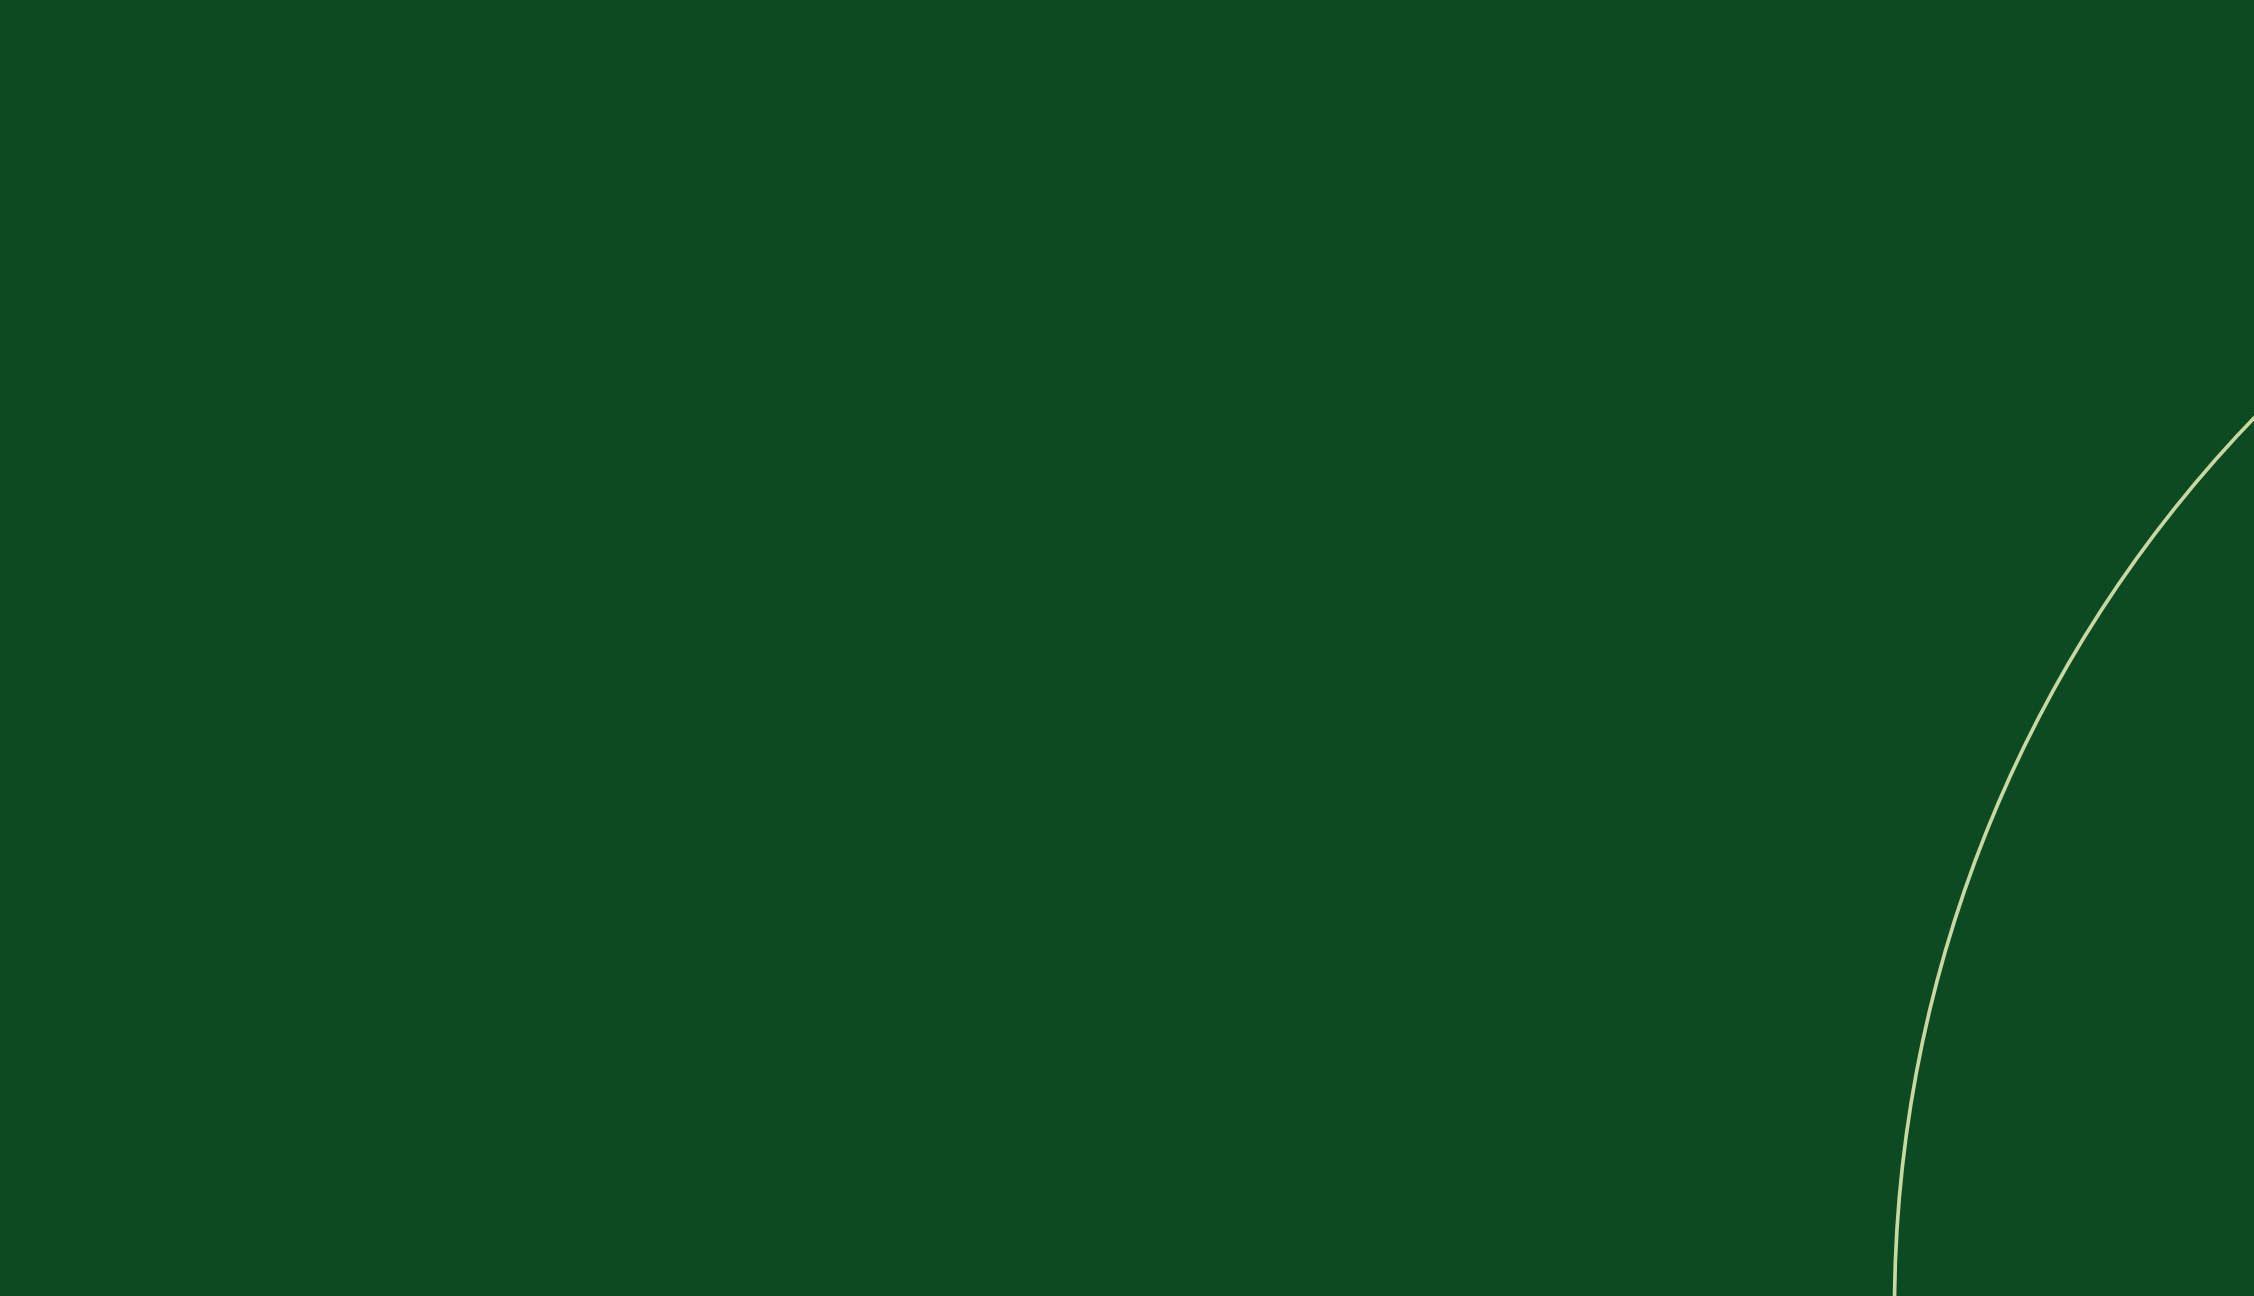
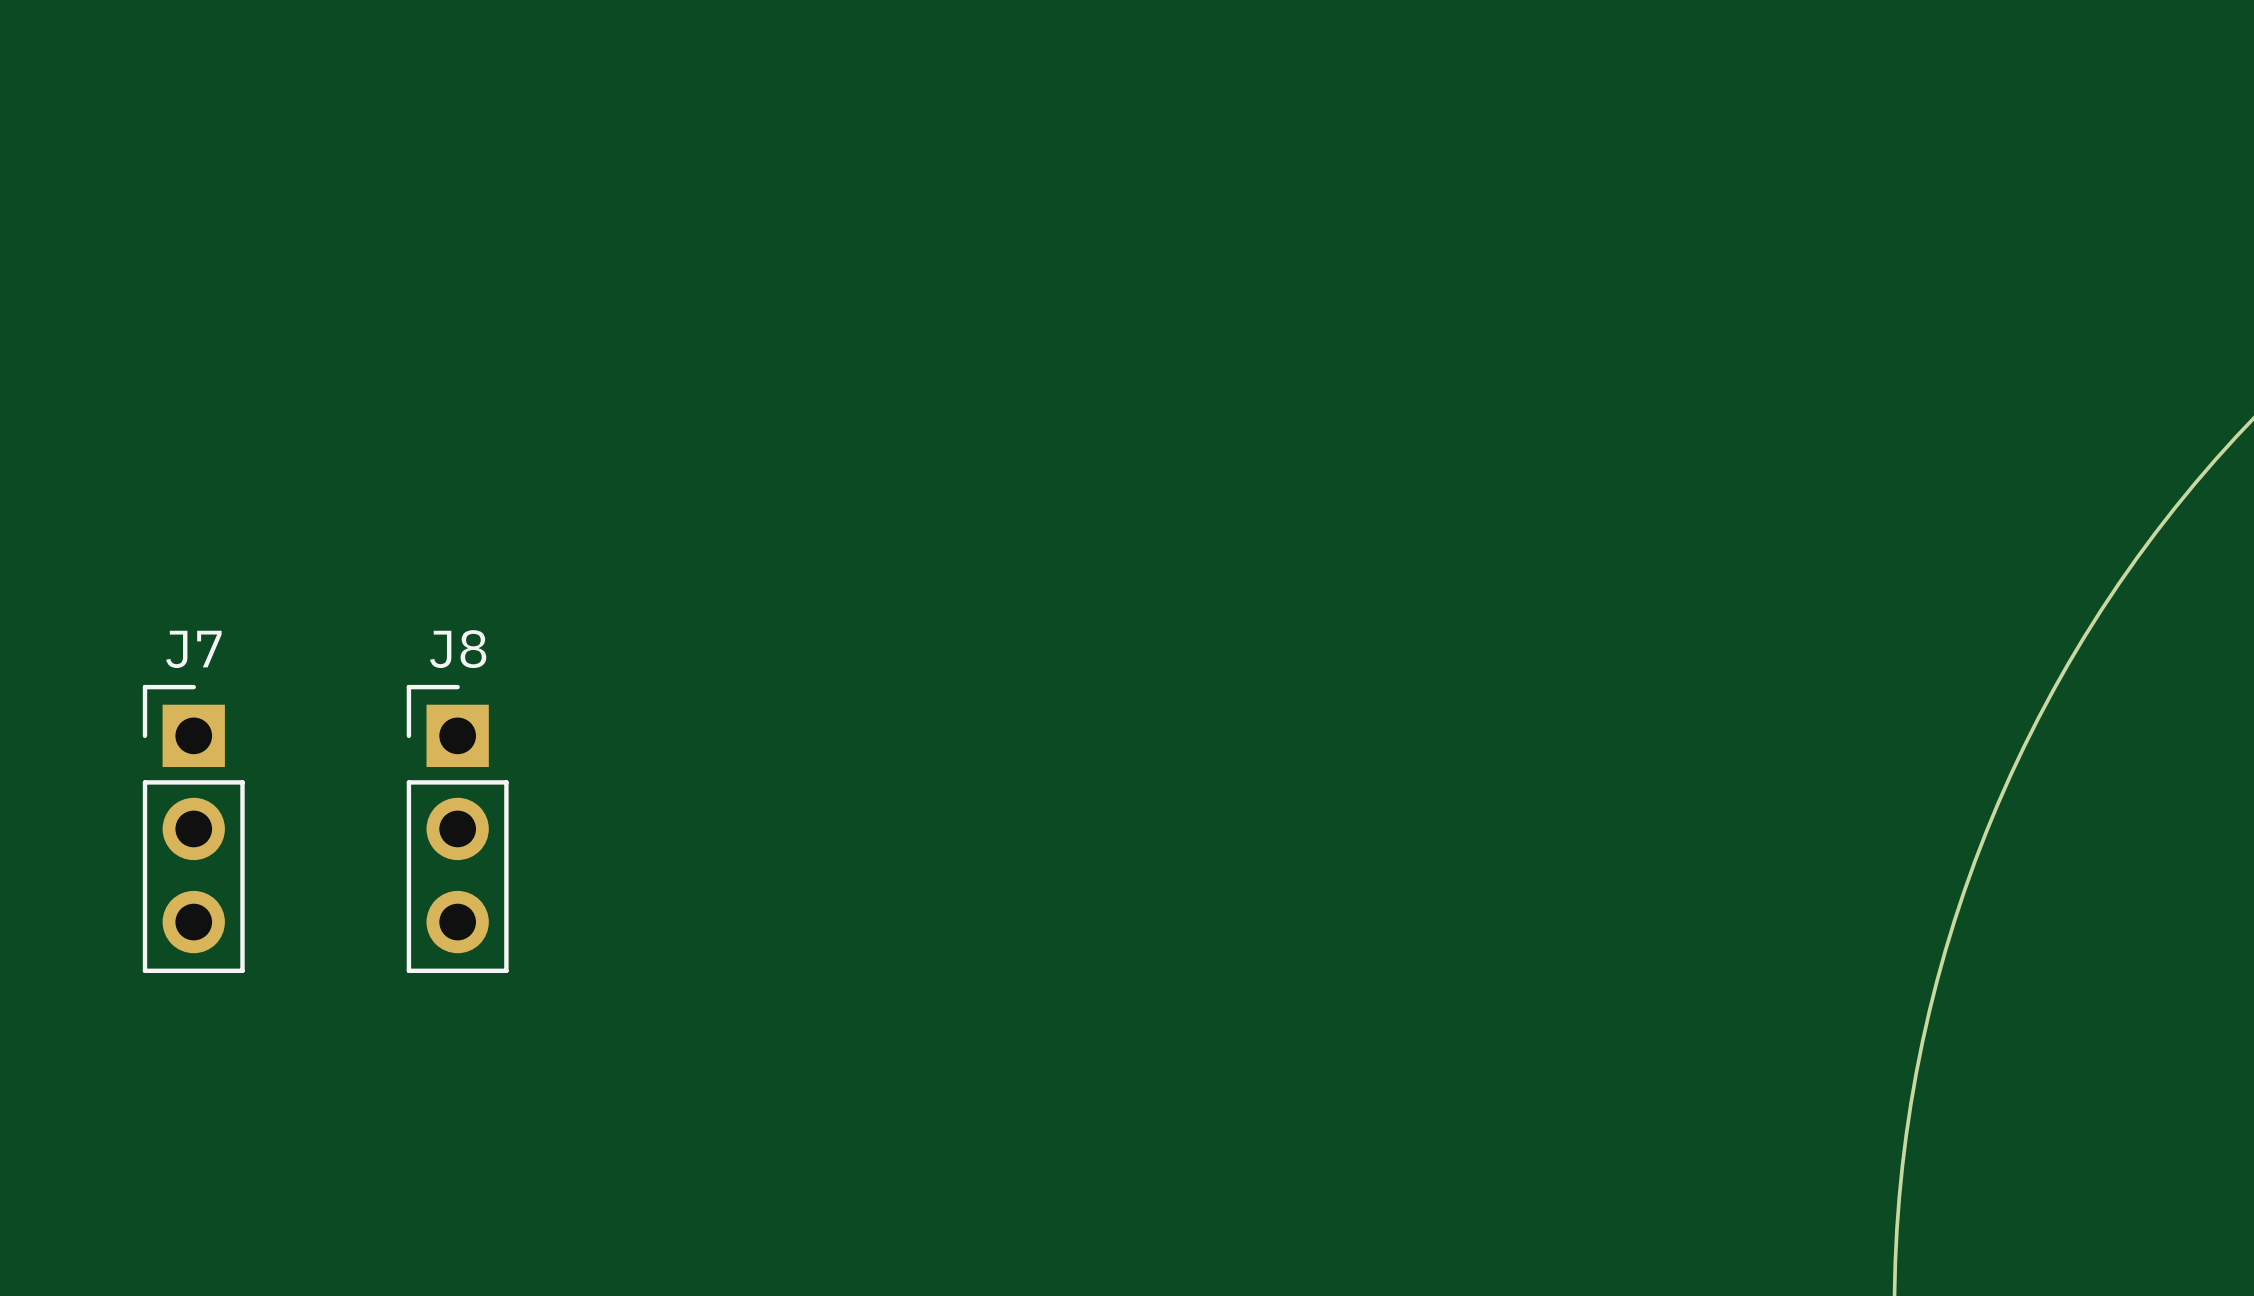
J7: none -> (193, 828)
J8: none -> (457, 828)

